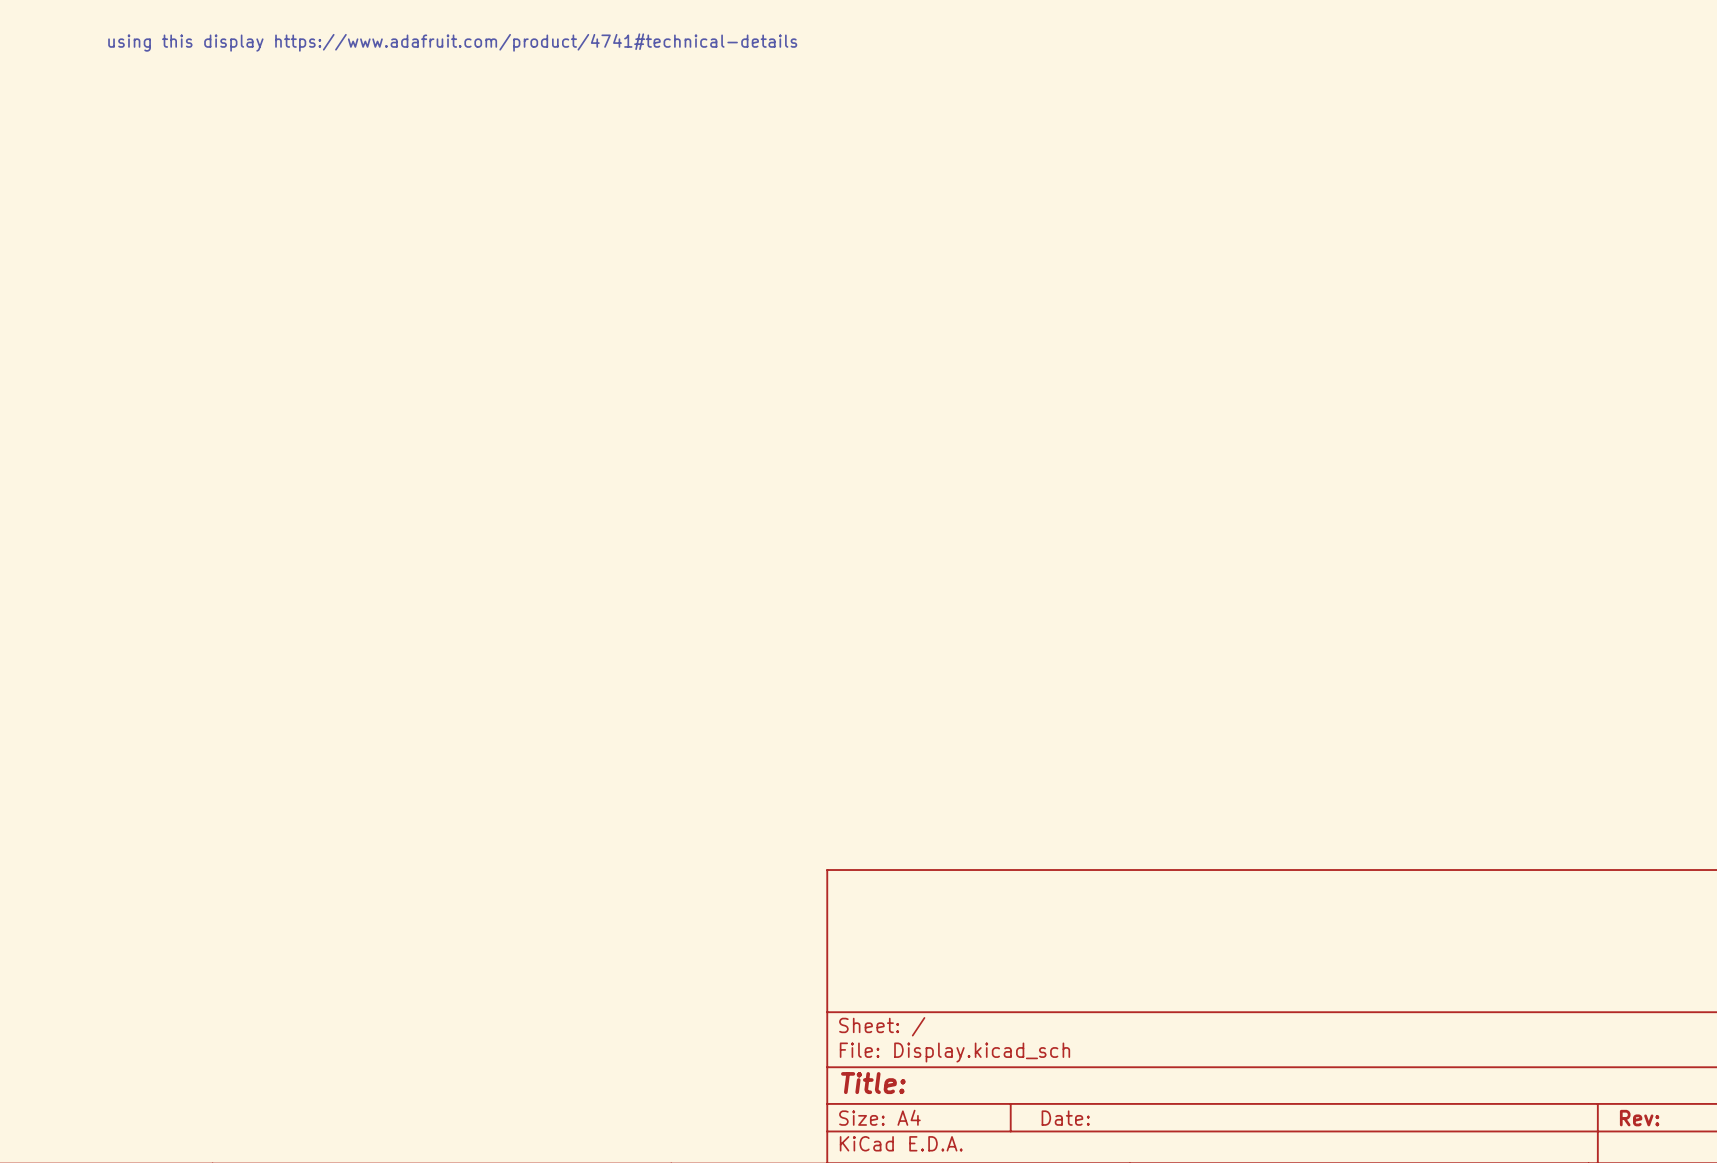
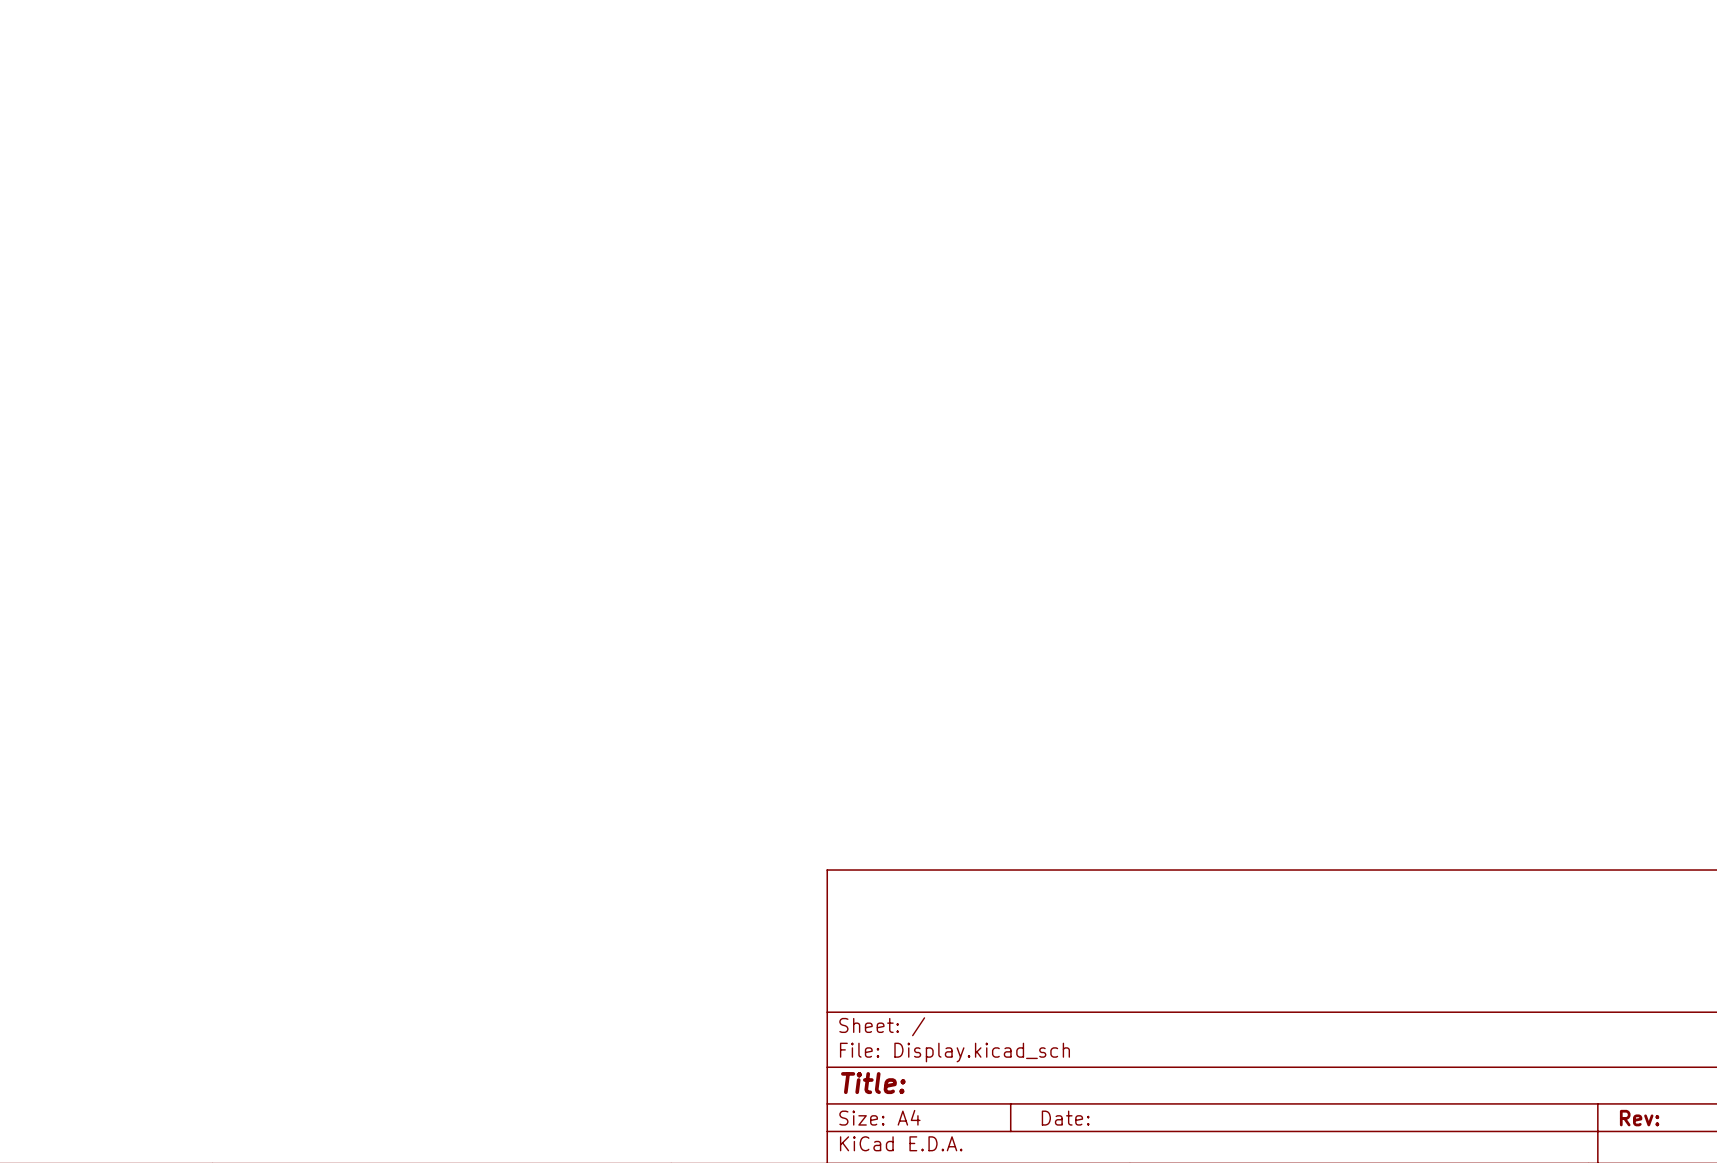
text: using this display https://www.adafruit.com/product/4741#technical-details (452, 42) -> none

